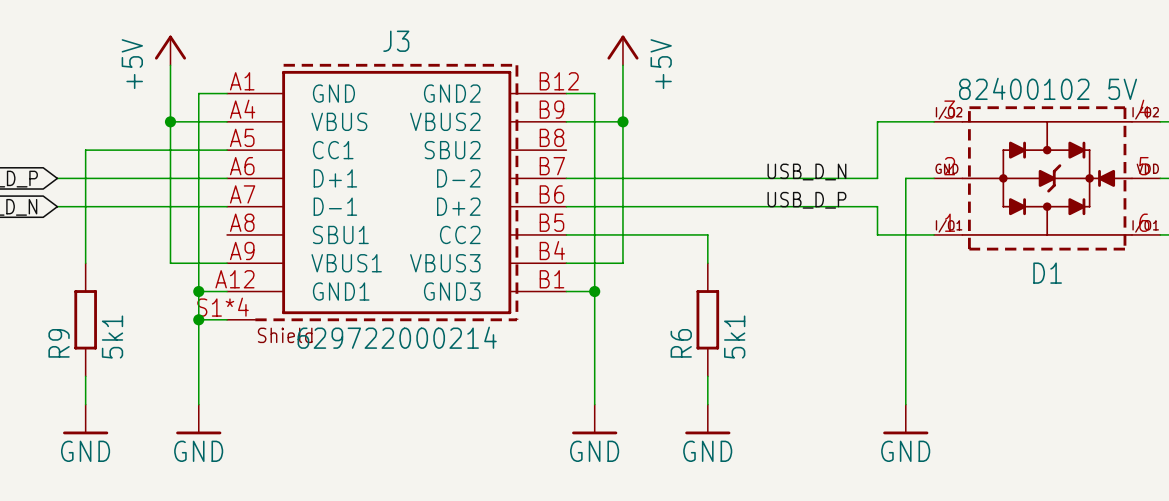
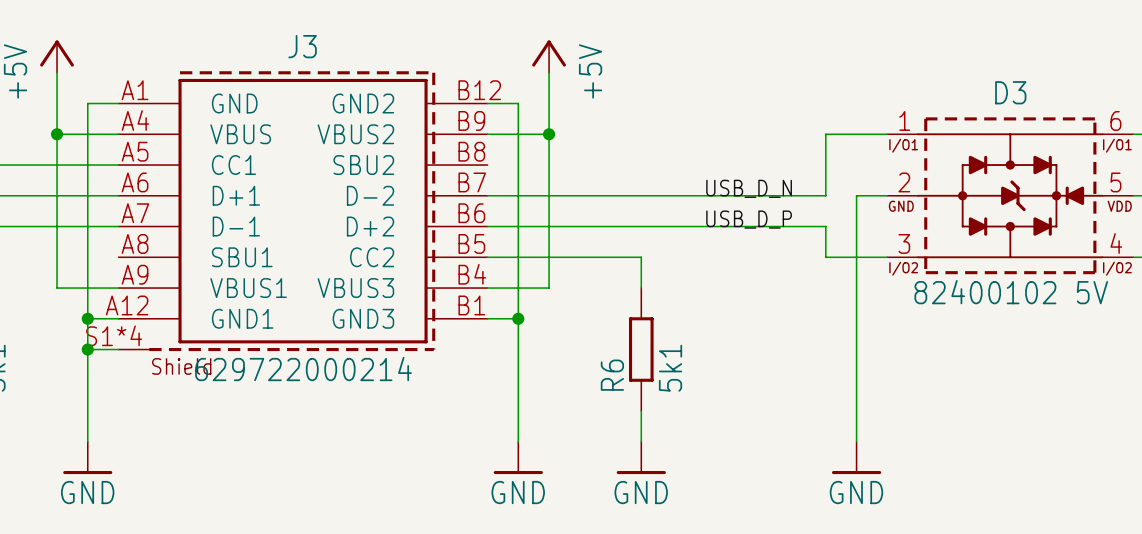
D1: 82400102 5V (1047, 178) -> none
D3: none -> 82400102 5V (1010, 195)

